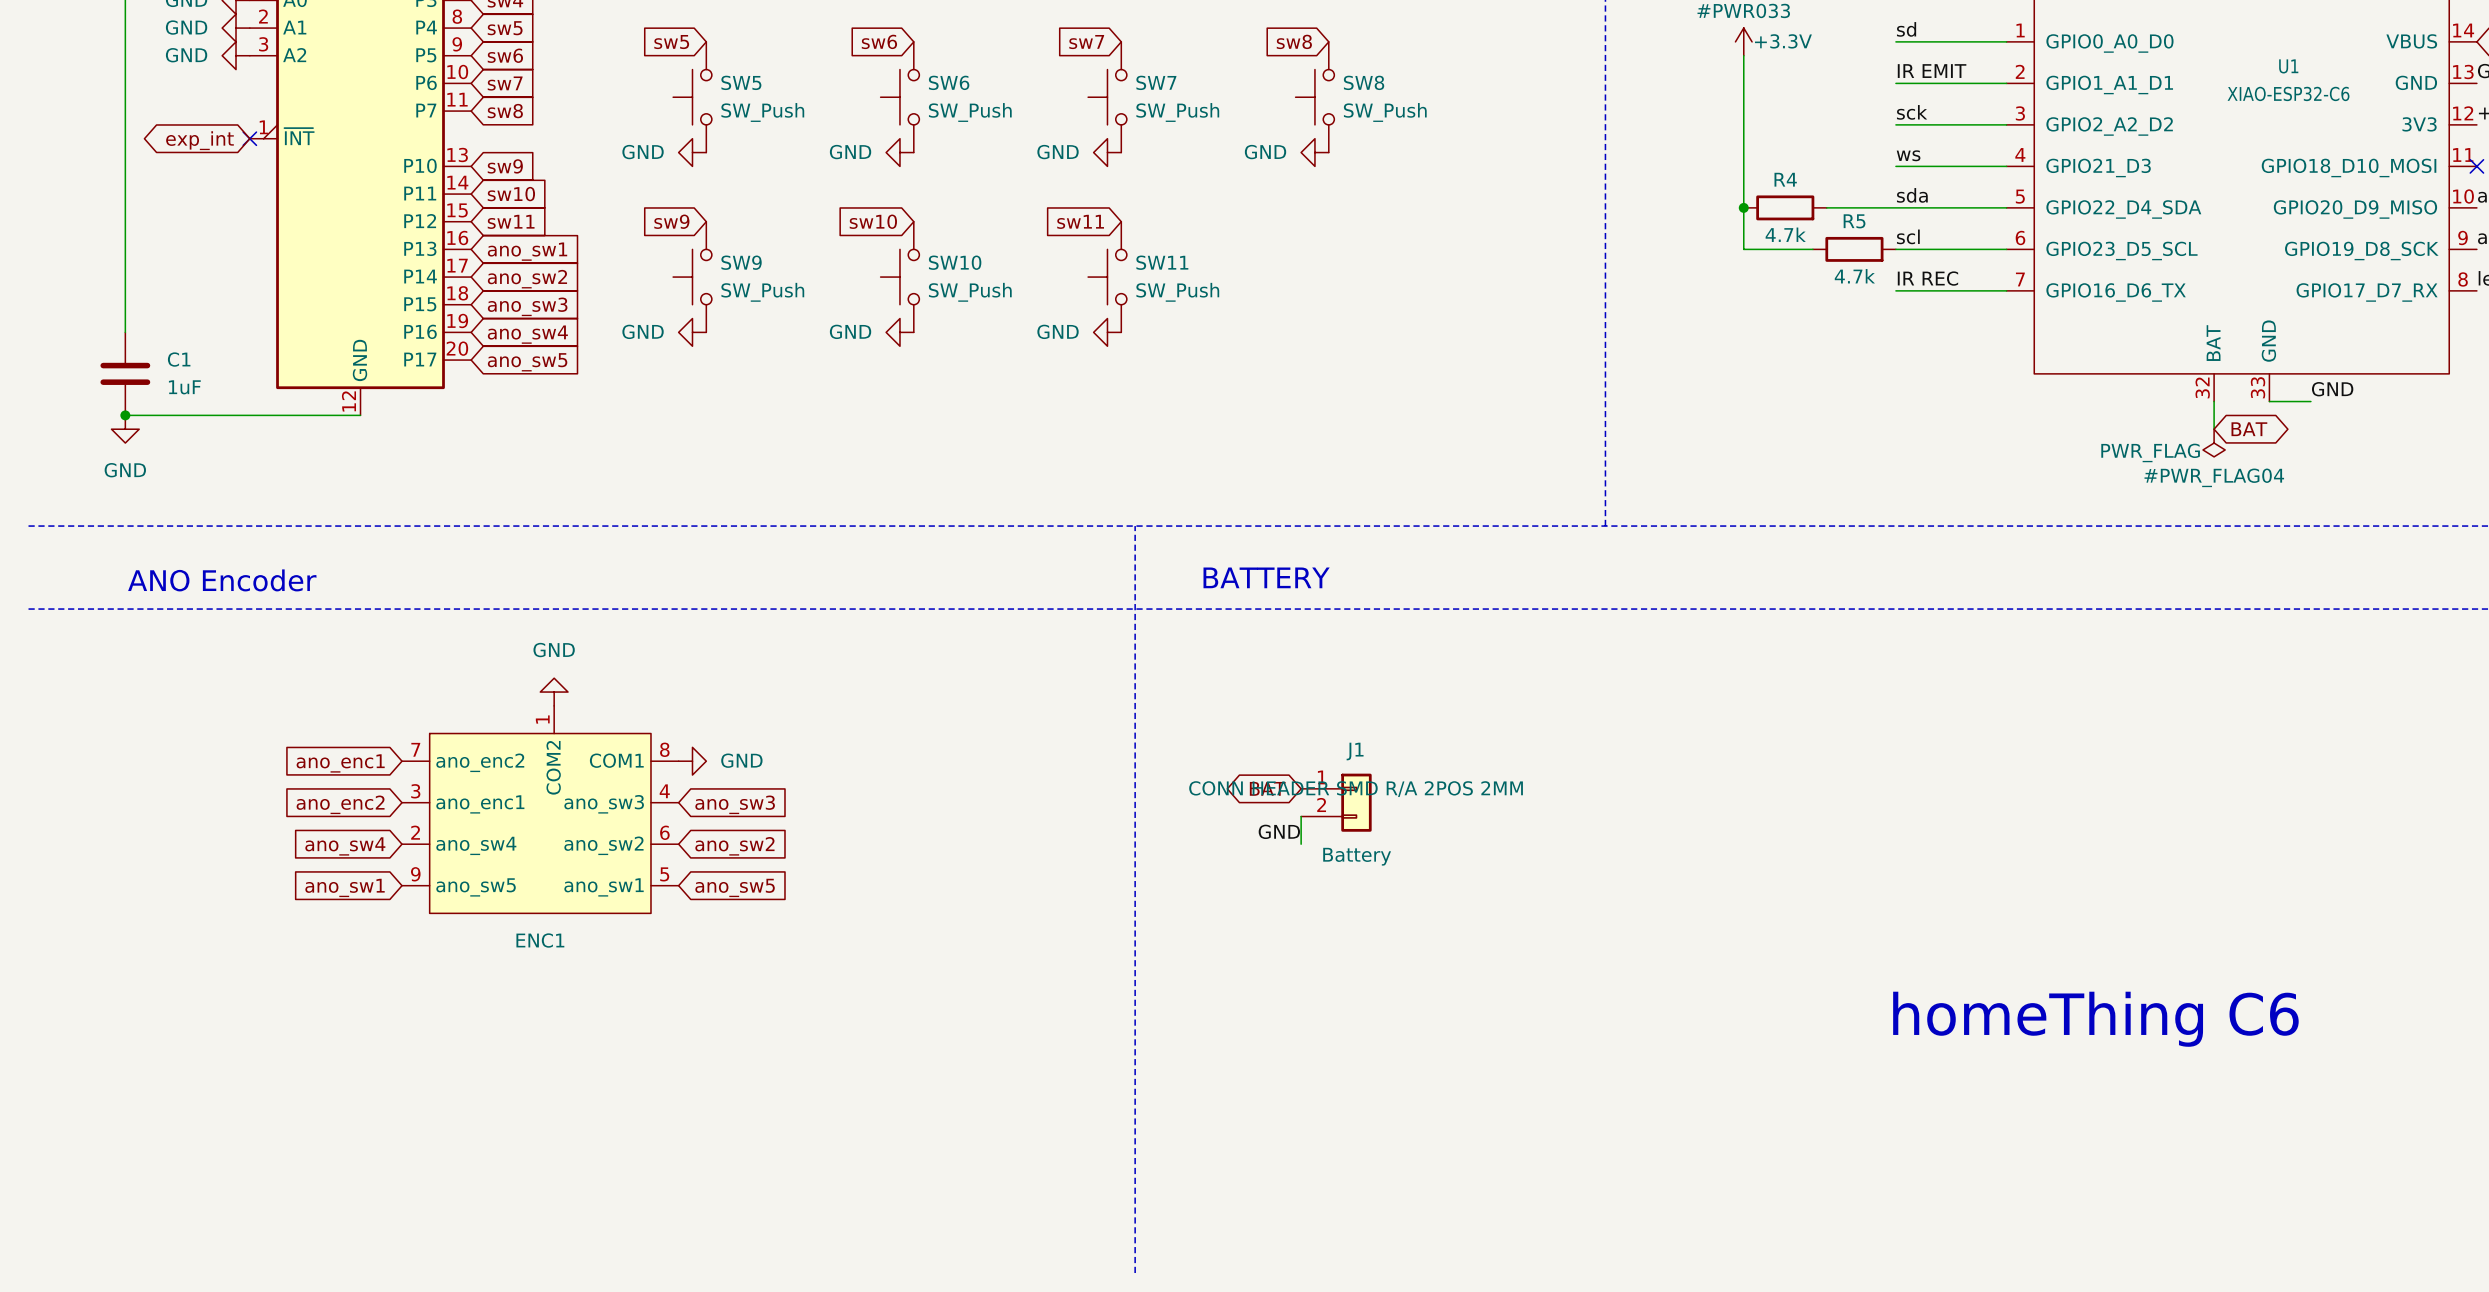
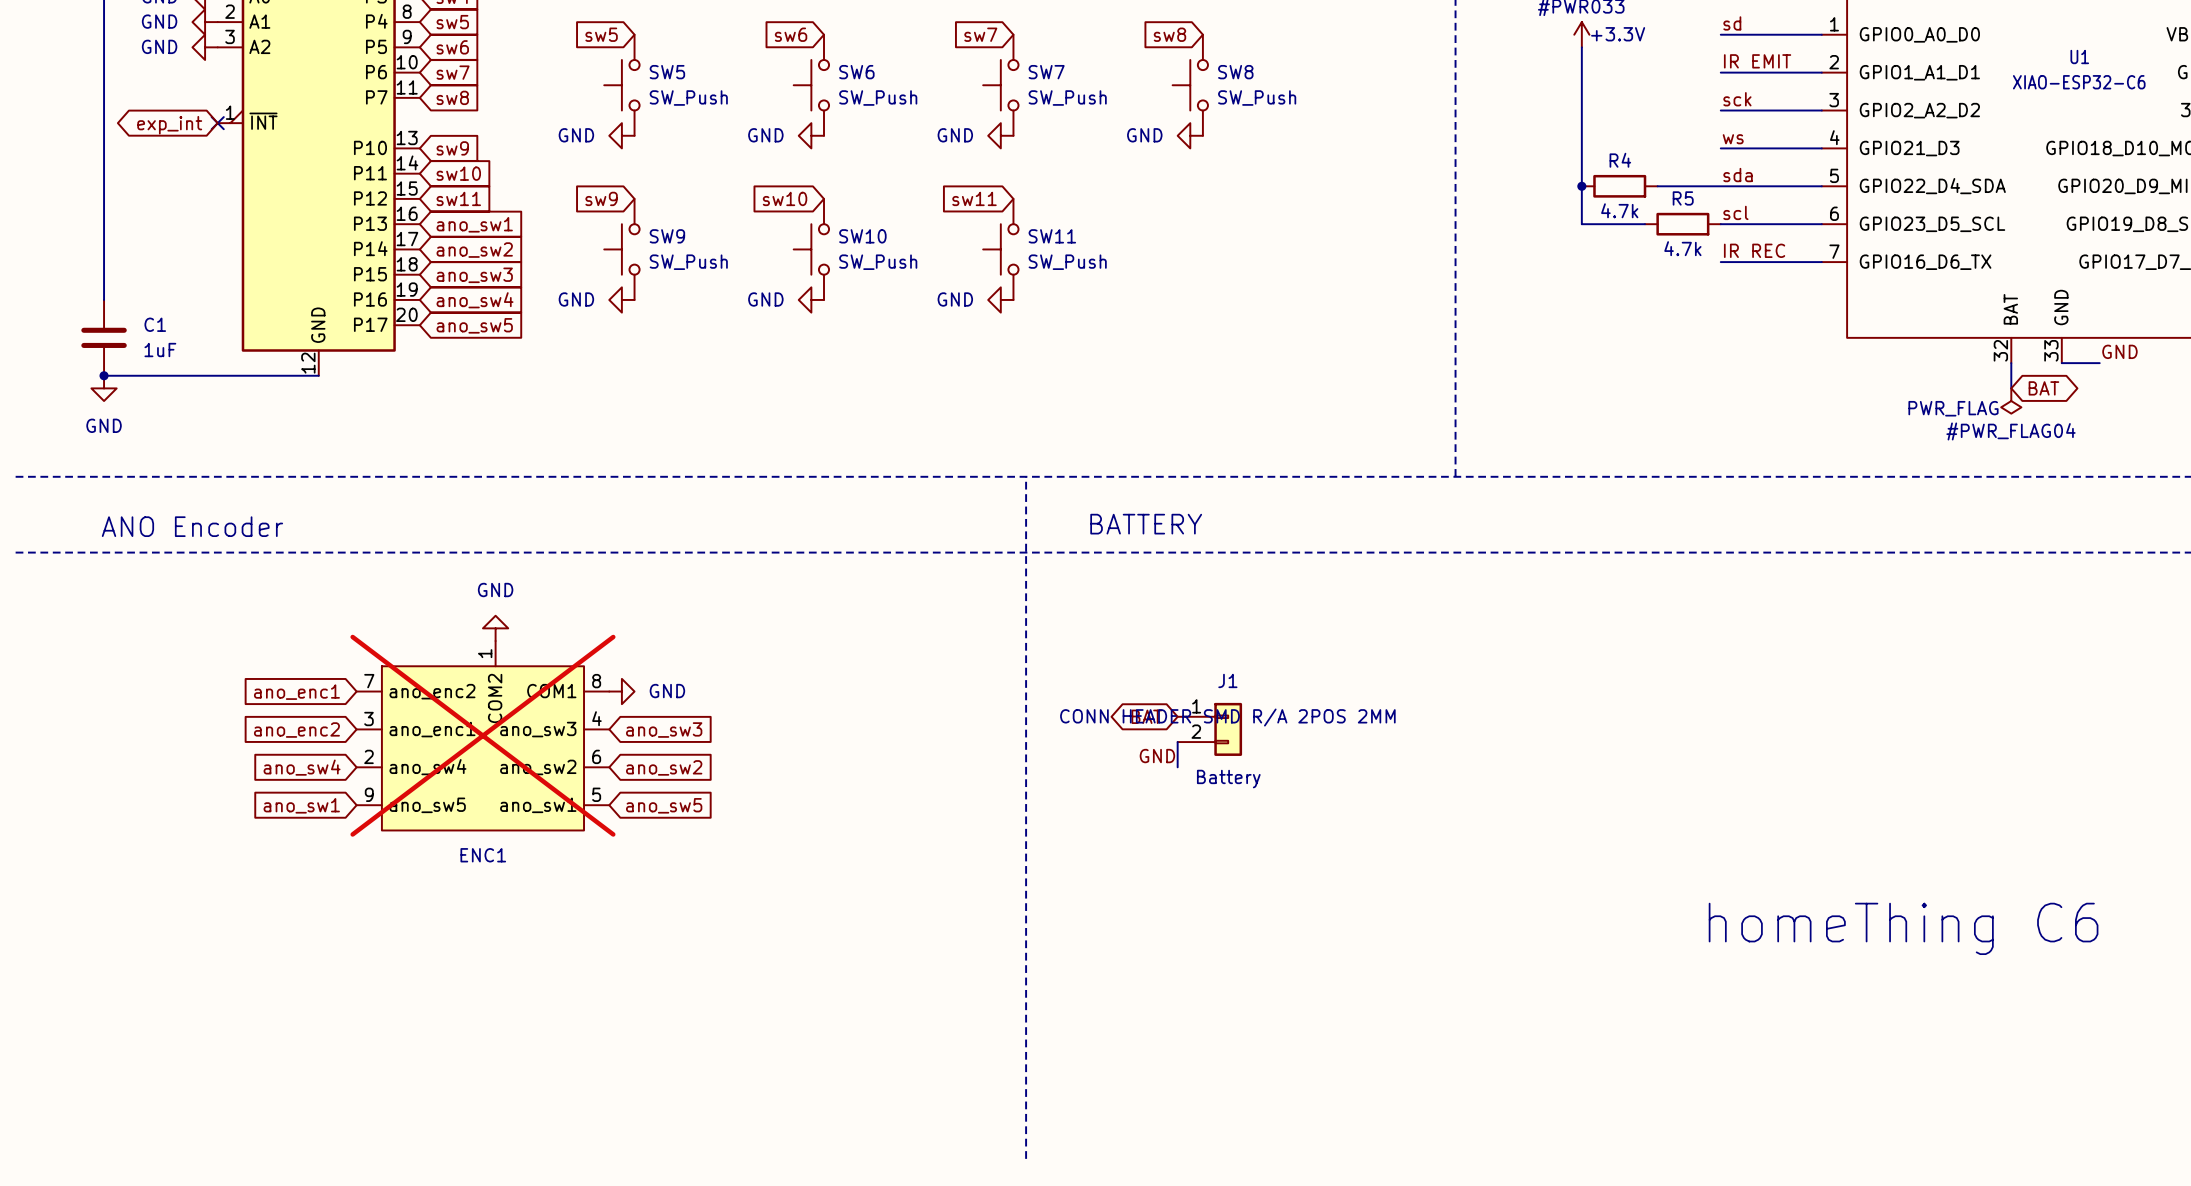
ENC1 do-not-place cross: none -> (482, 735)

